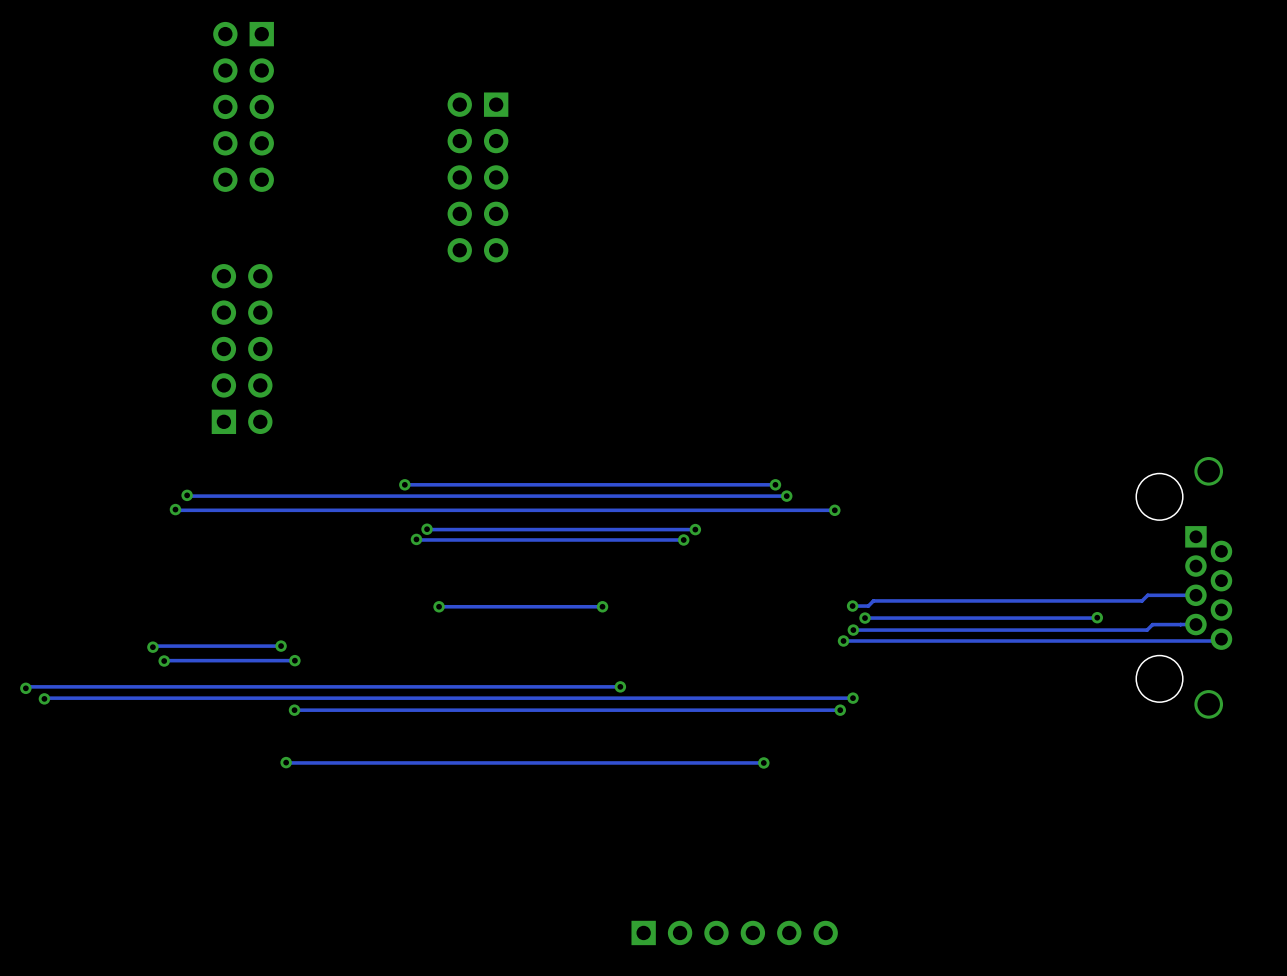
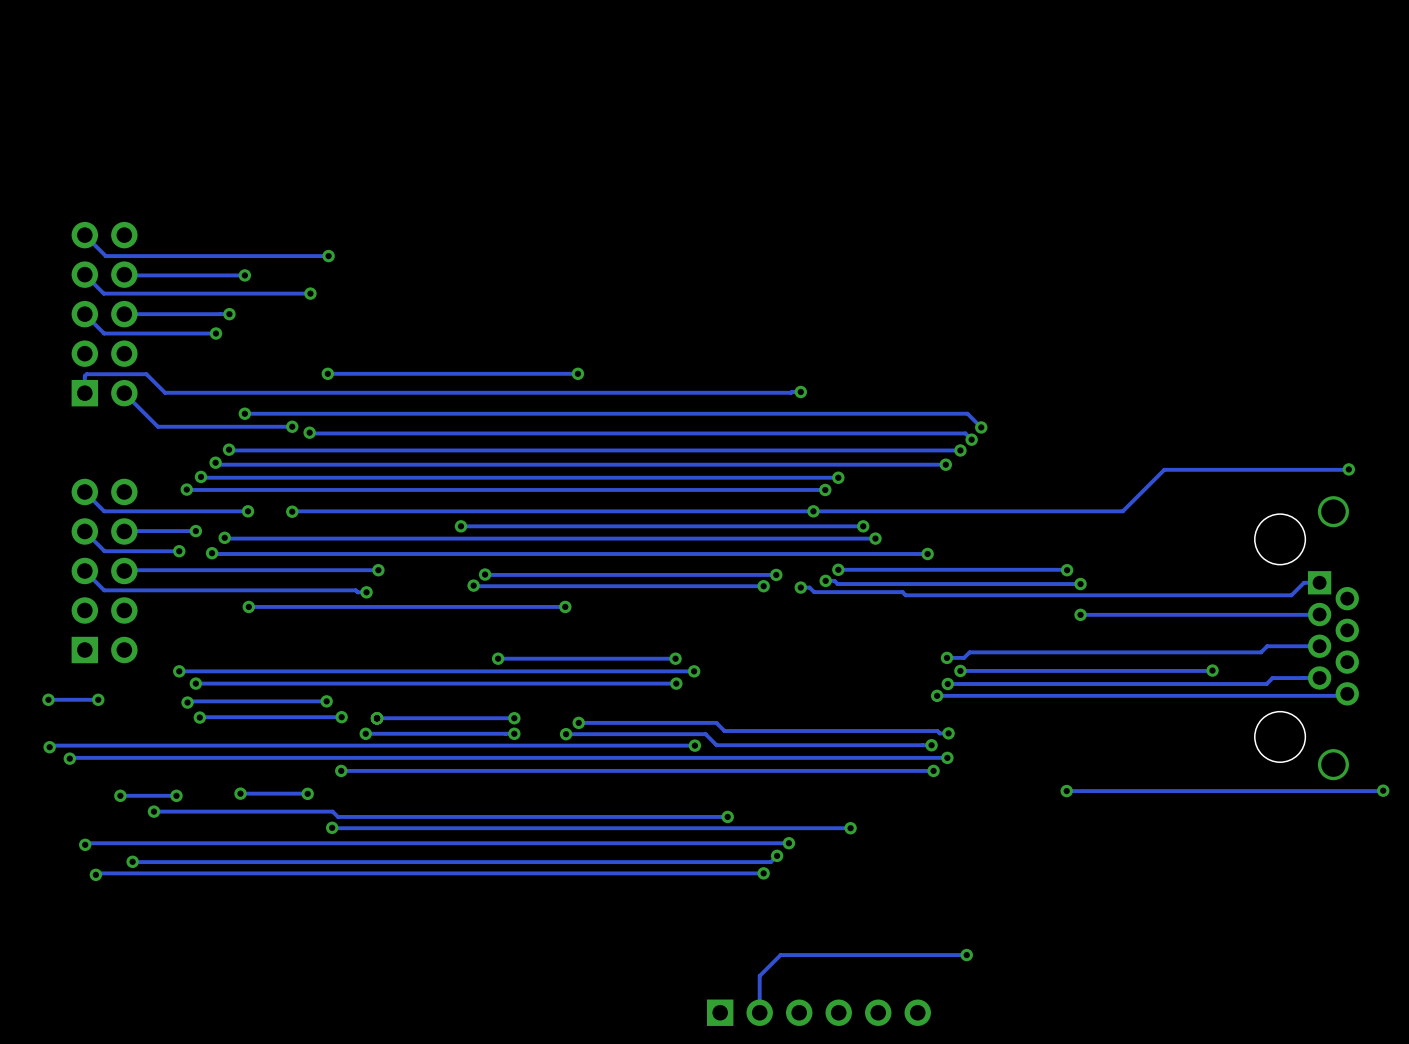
part: (243, 106) -> none
part: (477, 177) -> none
track: none -> (84, 235) (105, 256) (328, 256)
via: none -> (328, 256)
track: none -> (84, 274) (103, 293) (310, 293)
track: none -> (124, 274) (244, 275)
via: none -> (244, 275)
via: none -> (310, 293)
track: none -> (84, 314) (104, 333) (216, 333)
part: none -> (104, 314)
track: none -> (229, 314) (124, 314)
via: none -> (229, 314)
via: none -> (216, 333)
via: none -> (327, 373)
track: none -> (577, 373) (327, 373)
via: none -> (577, 373)
part: (242, 349) -> none
track: none -> (800, 391) (165, 392) (146, 374) (86, 374) (84, 376) (84, 393)
via: none -> (800, 391)
track: none -> (124, 393) (157, 426) (292, 426)
track: none -> (244, 413) (967, 413) (981, 427)
via: none -> (244, 413)
via: none -> (292, 426)
via: none -> (981, 427)
track: none -> (309, 432) (965, 433) (971, 439)
via: none -> (309, 432)
via: none -> (971, 439)
track: none -> (229, 449) (960, 450)
via: none -> (229, 449)
via: none -> (960, 450)
track: none -> (215, 462) (217, 464) (945, 464)
via: none -> (215, 462)
via: none -> (945, 464)
track: none -> (1348, 469) (1164, 469) (1122, 511) (292, 511)
via: none -> (1348, 469)
track: none -> (200, 476) (838, 477)
via: none -> (200, 476)
via: none -> (838, 477)
track: none -> (186, 489) (825, 489)
via: none -> (186, 489)
via: none -> (825, 489)
track: none -> (84, 491) (104, 511) (248, 511)
via: none -> (248, 511)
via: none -> (813, 511)
via: none -> (292, 511)
track: none -> (84, 531) (104, 551) (179, 551)
track: none -> (195, 531) (124, 531)
via: none -> (195, 531)
via: none -> (179, 551)
track: none -> (838, 569) (1067, 570)
via: none -> (838, 569)
track: none -> (84, 570) (104, 590) (355, 590) (357, 592) (366, 592)
part: none -> (104, 570)
track: none -> (378, 570) (124, 570)
via: none -> (378, 570)
via: none -> (1067, 570)
track: none -> (825, 580) (834, 580) (837, 584) (1080, 584)
via: none -> (825, 580)
track: none -> (1319, 582) (1304, 582) (1291, 595) (905, 595) (902, 592) (814, 592) (809, 587) (800, 587)
via: none -> (1080, 584)
via: none -> (800, 587)
via: none -> (366, 592)
via: none -> (248, 606)
track: none -> (565, 606) (248, 606)
via: none -> (565, 606)
via: none -> (1080, 614)
track: none -> (1319, 614) (1080, 614)
via: none -> (179, 671)
track: none -> (694, 671) (179, 671)
via: none -> (694, 671)
via: none -> (195, 683)
track: none -> (676, 683) (195, 683)
via: none -> (676, 683)
via: none -> (48, 699)
track: none -> (98, 699) (48, 699)
via: none -> (98, 699)
via: none -> (377, 718)
track: none -> (514, 718) (377, 718)
via: none -> (514, 718)
track: none -> (578, 722) (716, 722) (724, 731) (937, 731) (939, 733) (948, 733)
via: none -> (578, 722)
via: none -> (365, 733)
track: none -> (514, 733) (365, 733)
via: none -> (514, 733)
via: none -> (948, 733)
track: none -> (566, 734) (705, 734) (716, 745) (931, 745)
via: none -> (566, 734)
via: none -> (931, 745)
via: none -> (1066, 791)
track: none -> (1383, 790) (1066, 791)
via: none -> (1383, 790)
via: none -> (240, 793)
track: none -> (307, 793) (240, 793)
via: none -> (307, 793)
via: none -> (120, 795)
track: none -> (176, 795) (120, 795)
via: none -> (176, 795)
track: none -> (153, 811) (332, 811) (337, 816) (727, 816)
via: none -> (153, 811)
via: none -> (727, 816)
track: none -> (788, 843) (86, 843) (85, 844)
via: none -> (788, 843)
via: none -> (85, 844)
track: none -> (777, 855) (770, 862) (132, 861)
via: none -> (777, 855)
via: none -> (132, 861)
track: none -> (763, 873) (95, 874)
via: none -> (763, 873)
via: none -> (95, 874)
track: none -> (966, 955) (780, 955) (759, 975) (759, 1012)
via: none -> (966, 955)

